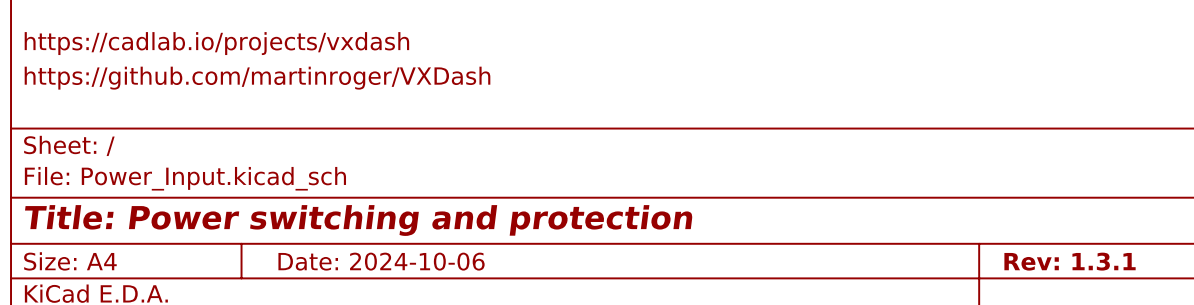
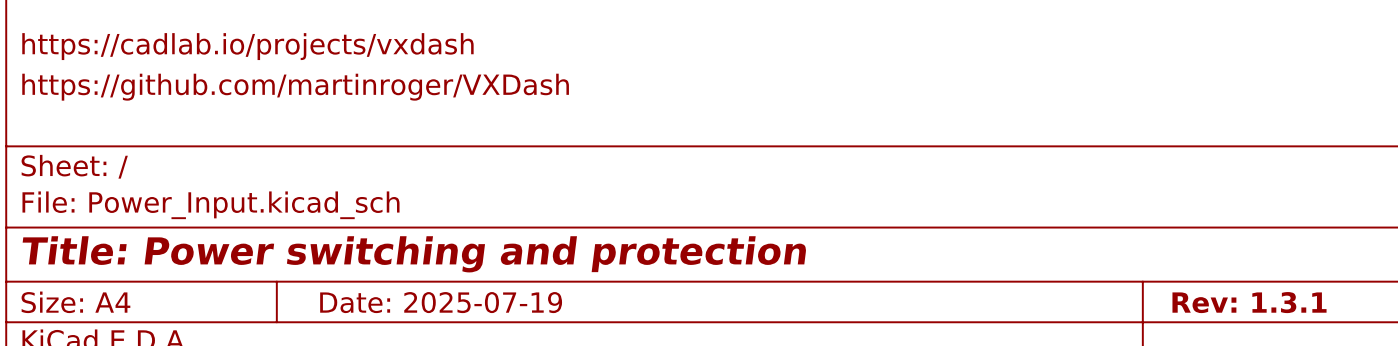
title block: Date: 2024-10-06 (381, 261) -> Date: 2025-07-19 (441, 302)

